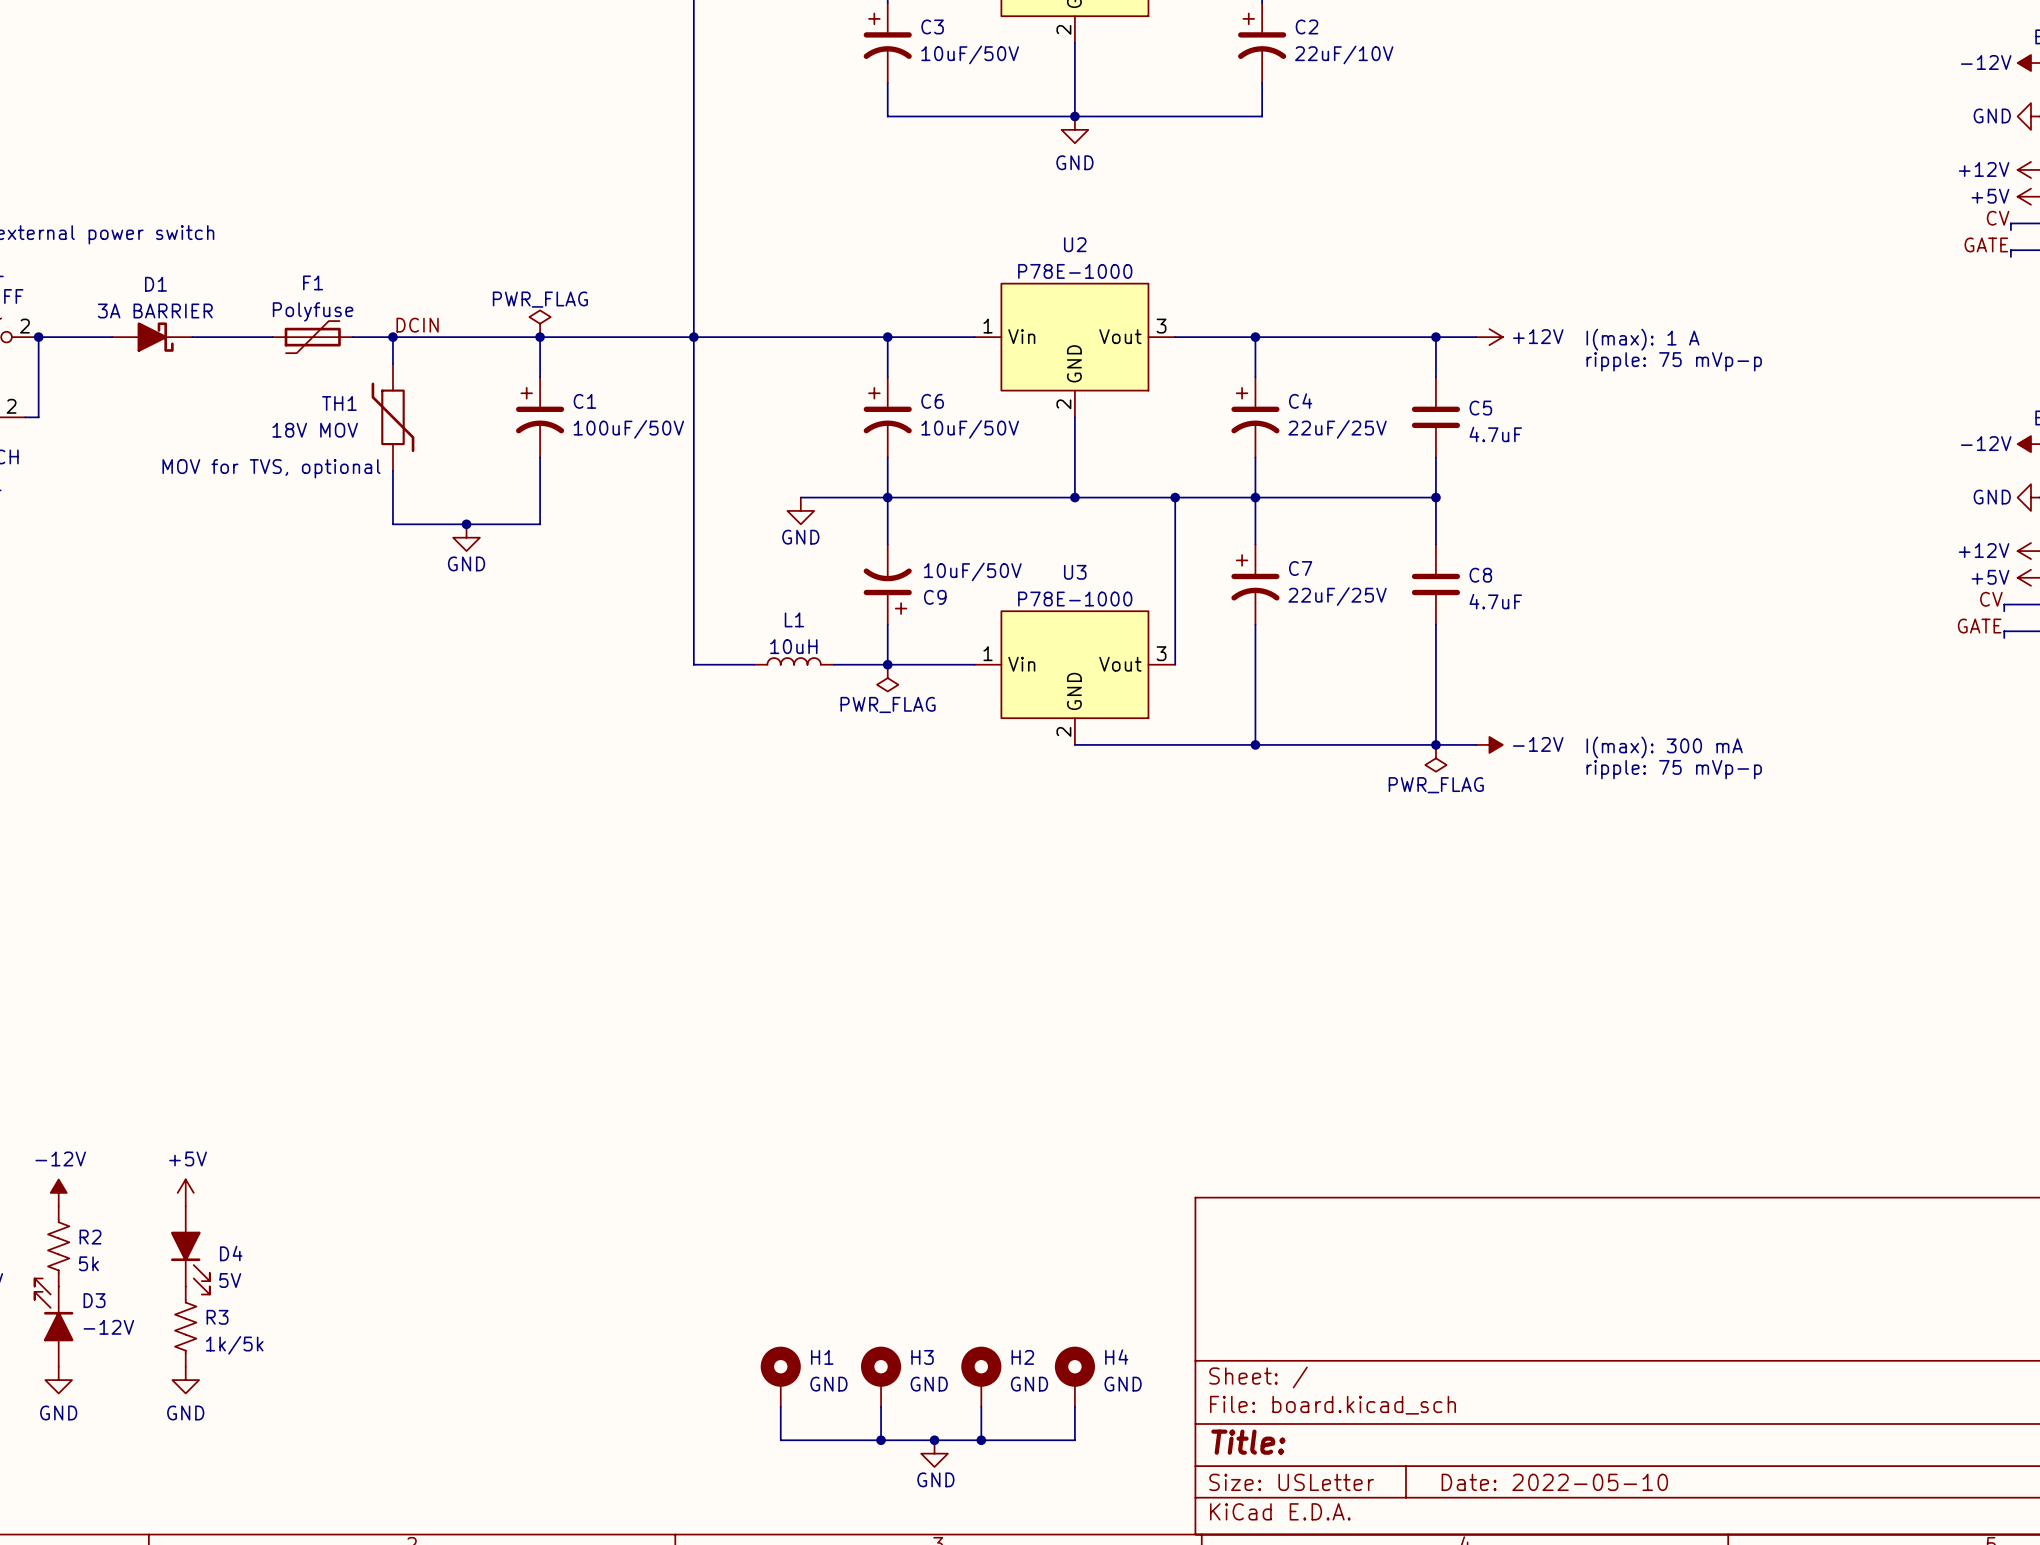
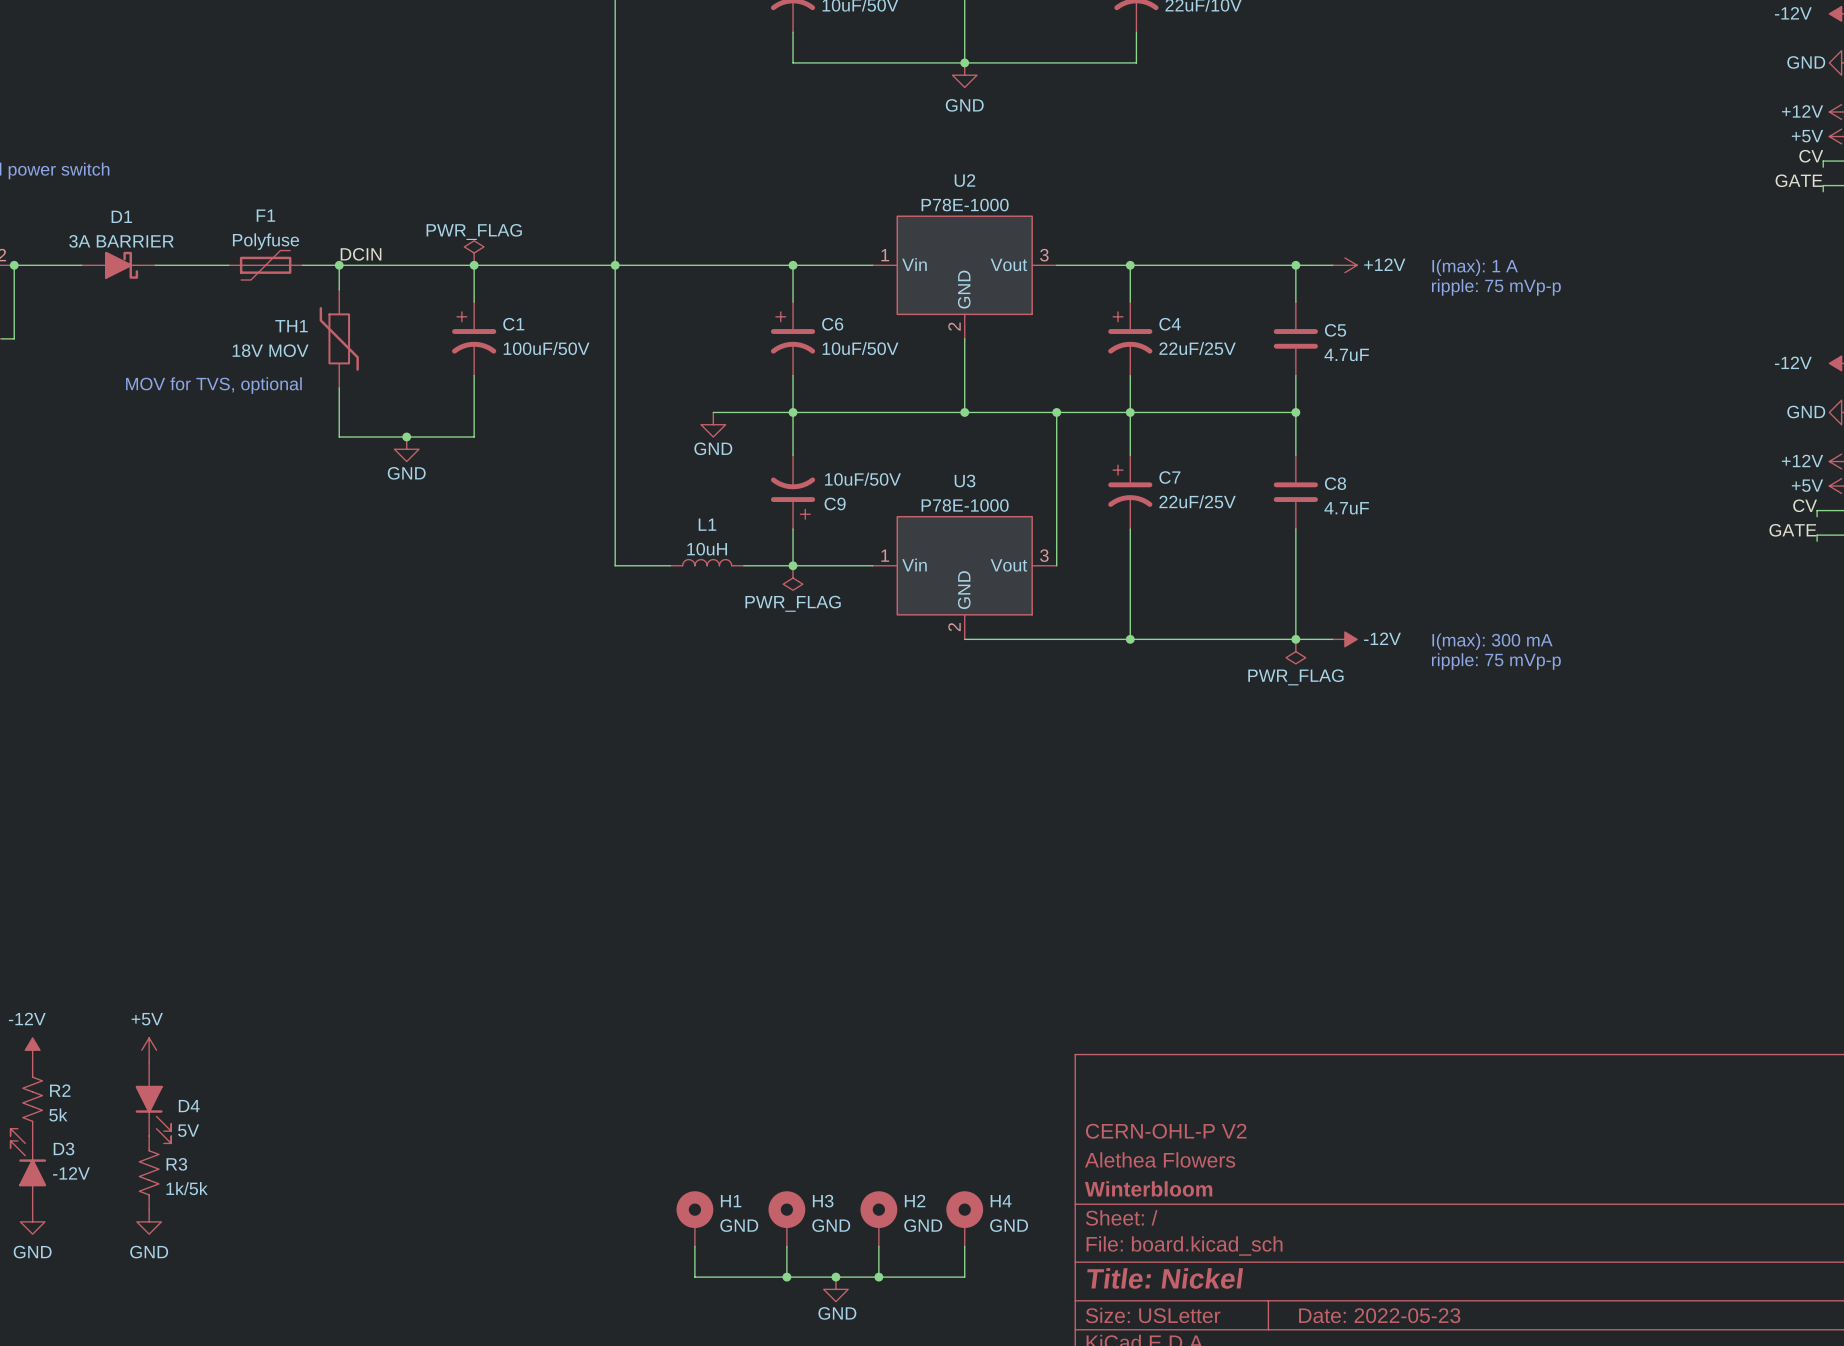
title block: none -> CERN-OHL-P V2 (1166, 1131)
title block: none -> Alethea Flowers (1160, 1159)
title block: none -> Winterbloom (1148, 1188)
title block: Title: (1248, 1442) -> Title: Nickel (1165, 1278)
title block: Date: 2022-05-10 (1554, 1482) -> Date: 2022-05-23 (1379, 1315)

